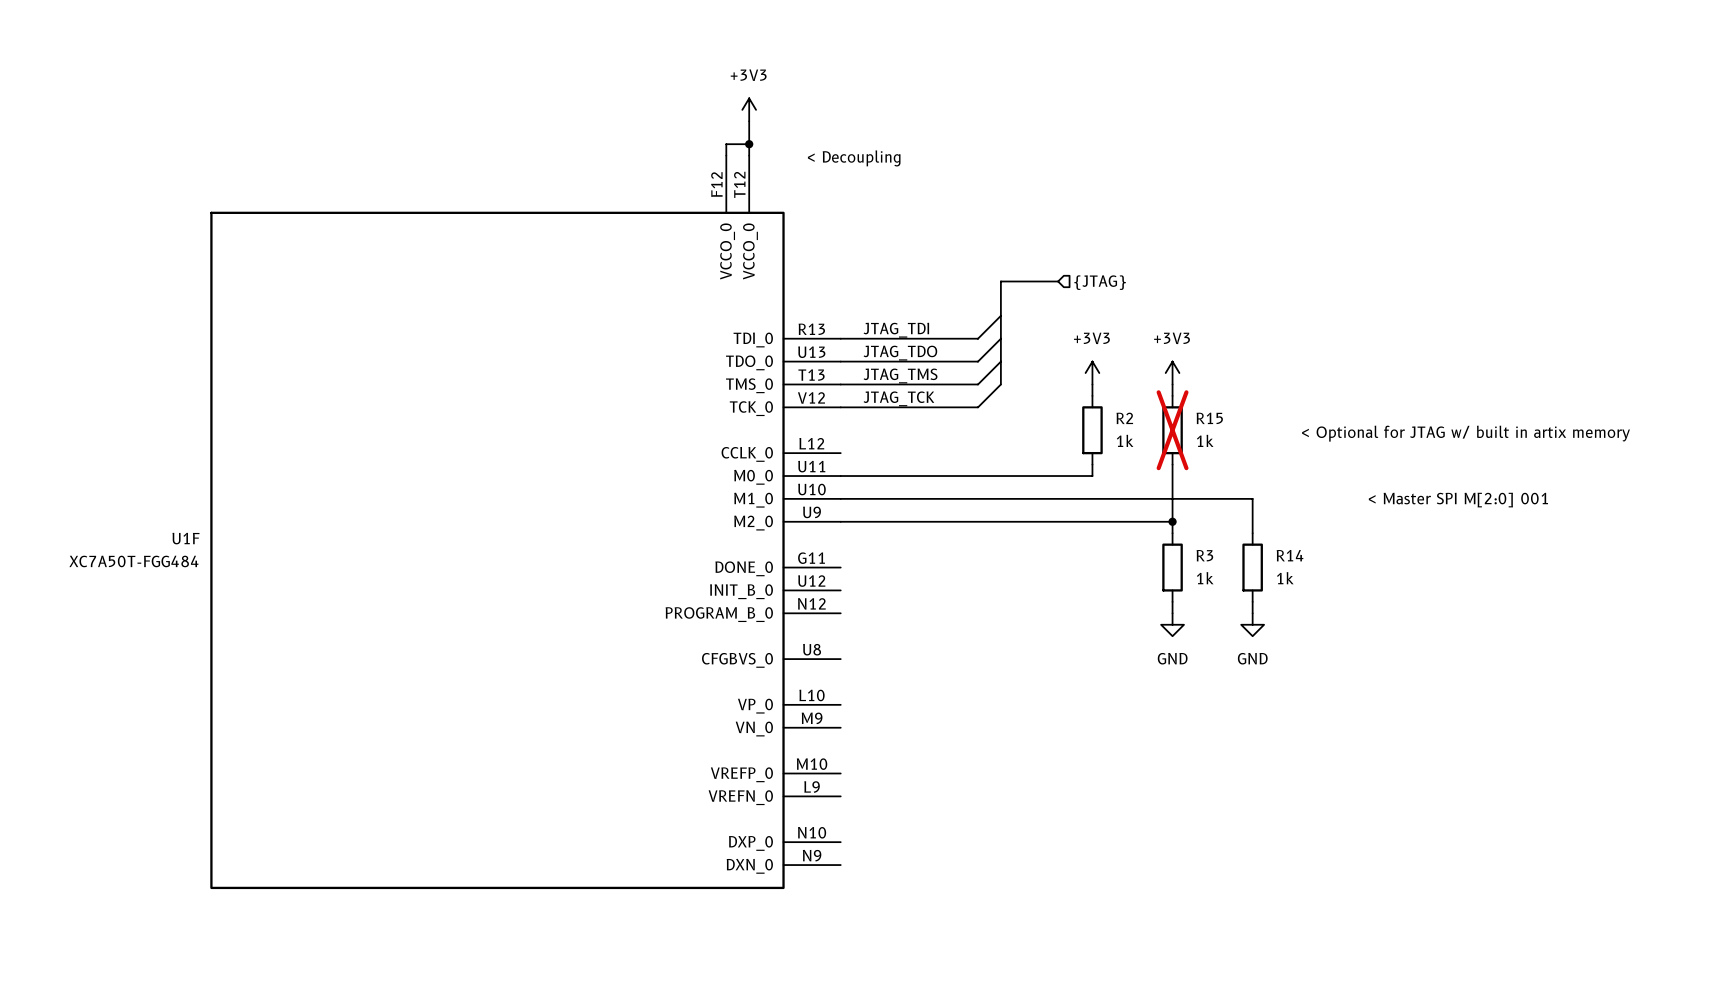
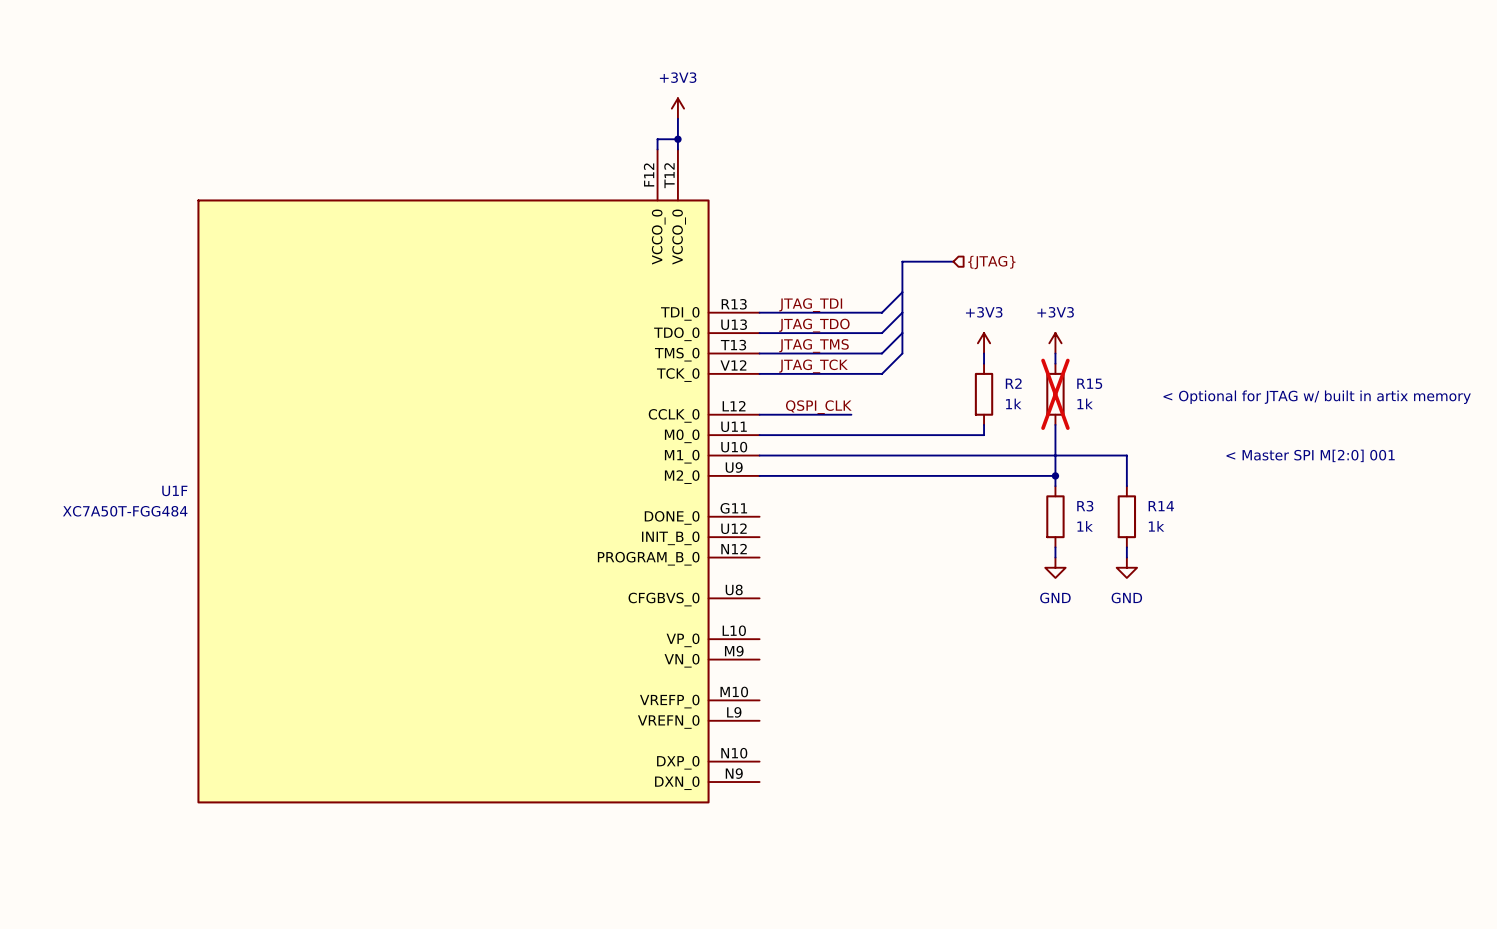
label: < Decoupling (854, 158) -> none
label: none -> QSPI_CLK (818, 407)
wire: none -> (759, 414) (851, 414)

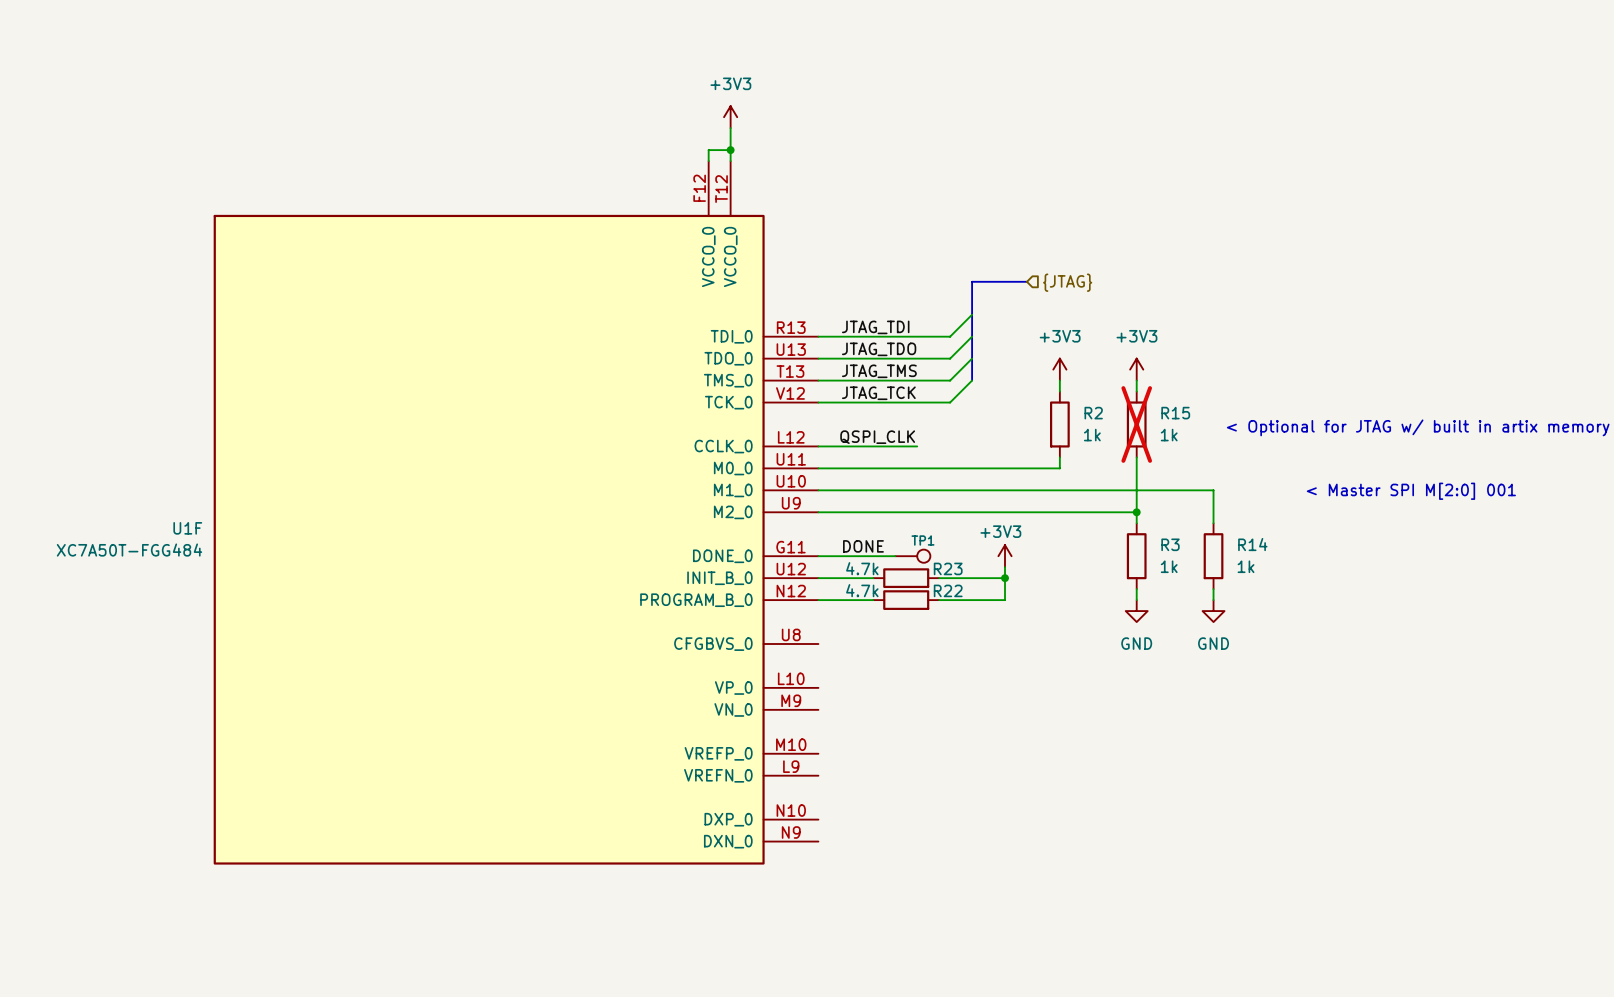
label: none -> DONE (863, 546)
wire: none -> (818, 556) (895, 556)
TP1: none -> (912, 556)
power symbol: none -> +3V3 (1005, 556)
wire: none -> (1005, 567) (1005, 600) (939, 600)
wire: none -> (818, 578) (873, 578)
R23: none -> 4.7k (906, 578)
wire: none -> (939, 578) (1005, 578)
junction: none -> (1005, 578)
wire: none -> (818, 600) (873, 600)
R22: none -> 4.7k (906, 600)

